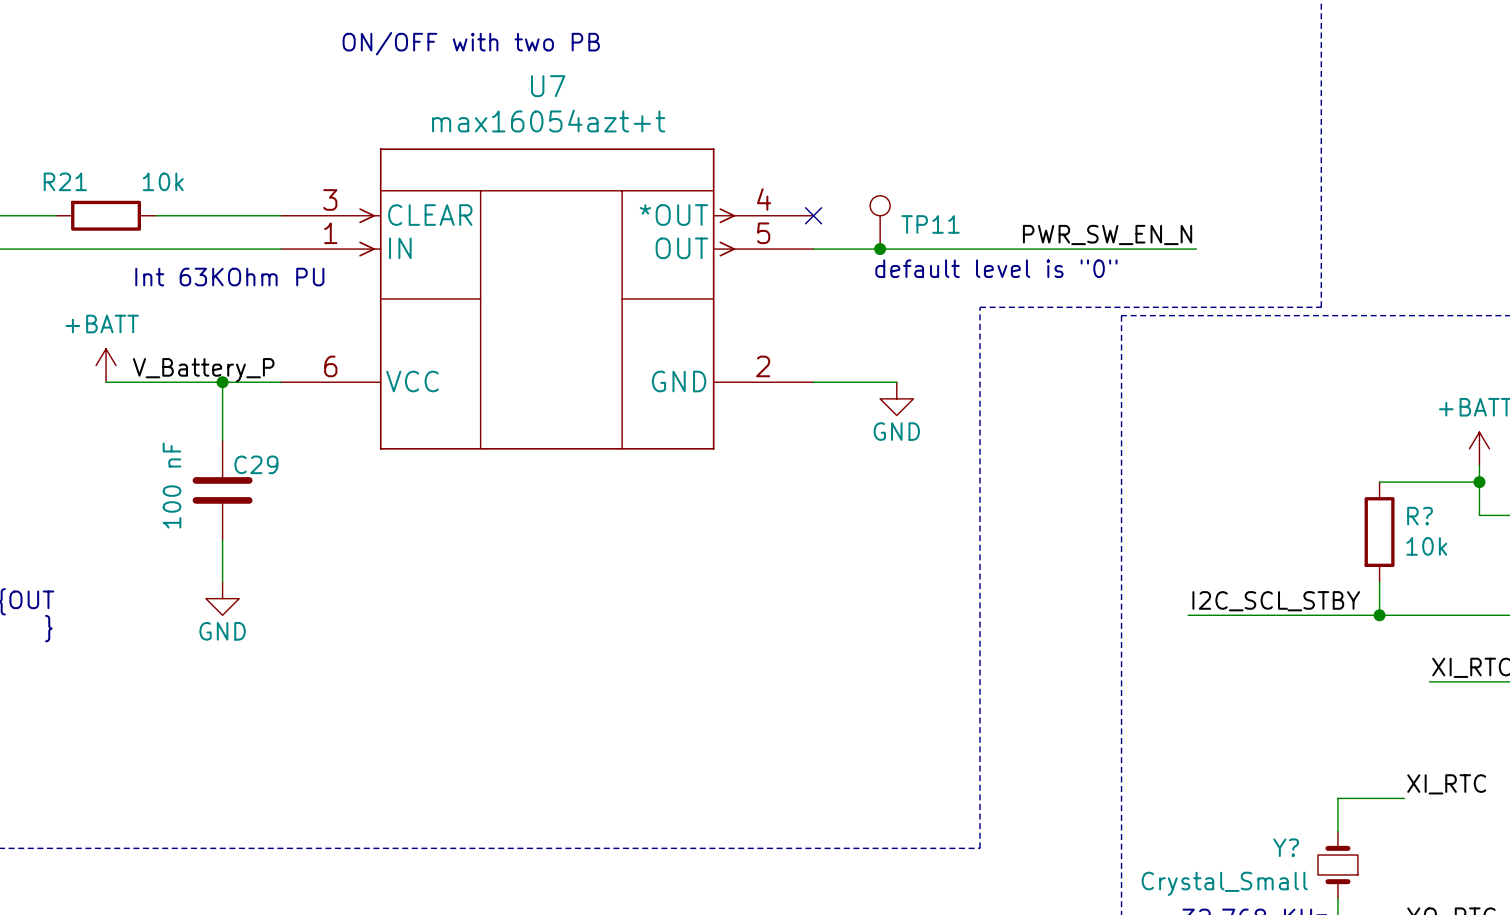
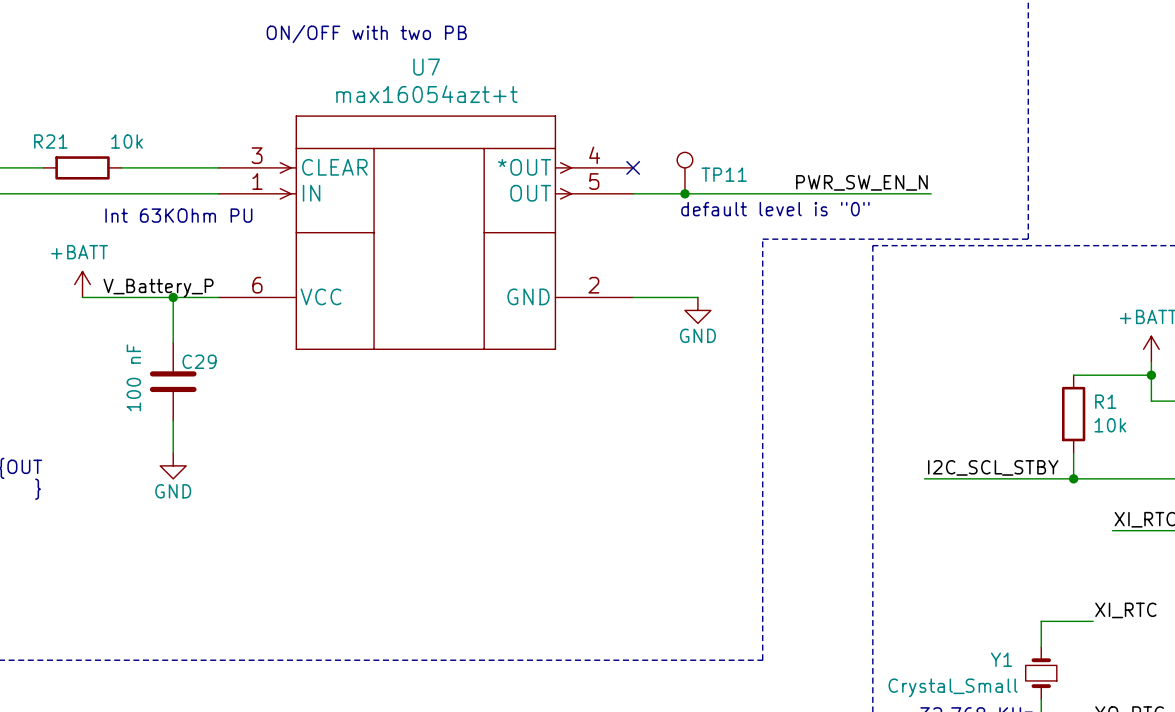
R? name: R? (1420, 516) -> R1 (1105, 401)
Y? name: Y? (1286, 847) -> Y1 (1001, 659)

